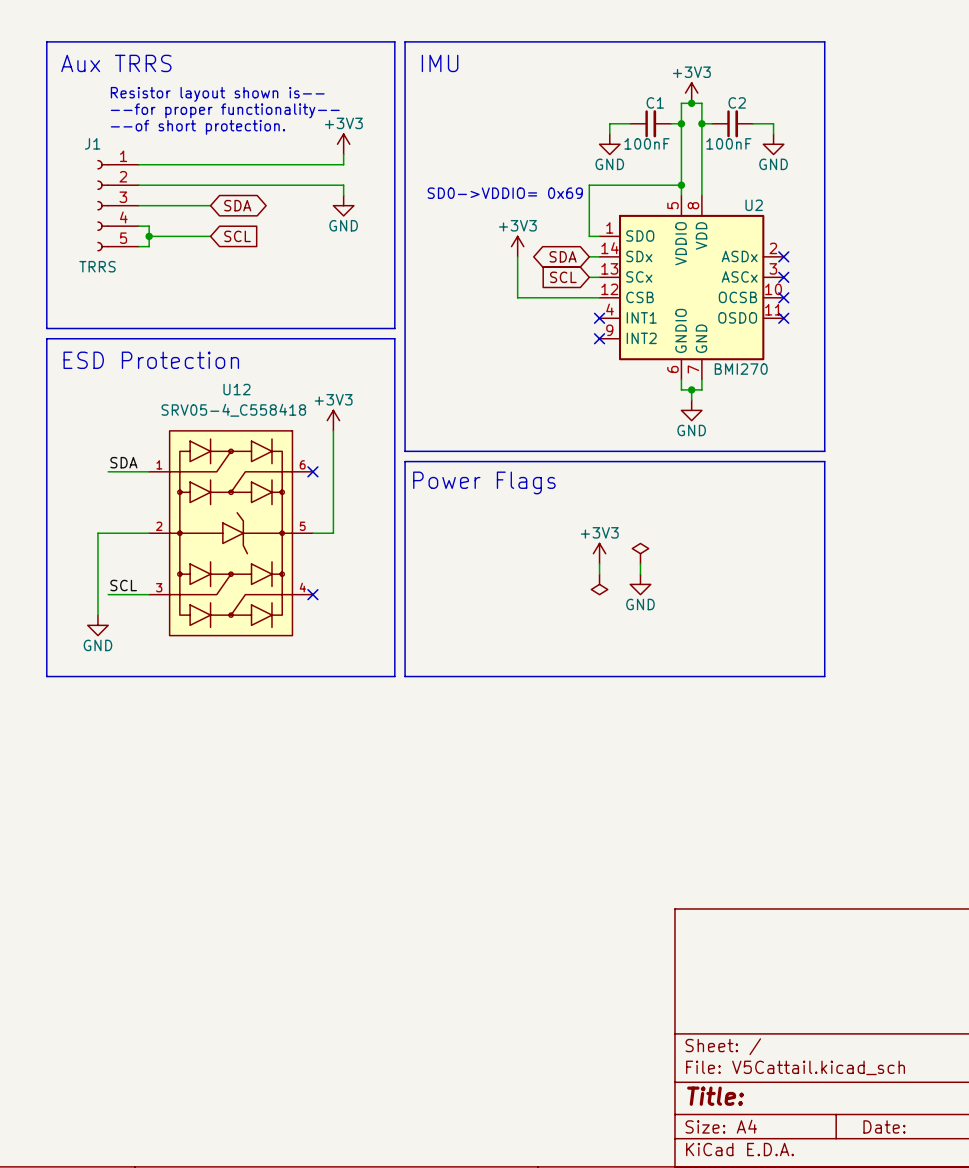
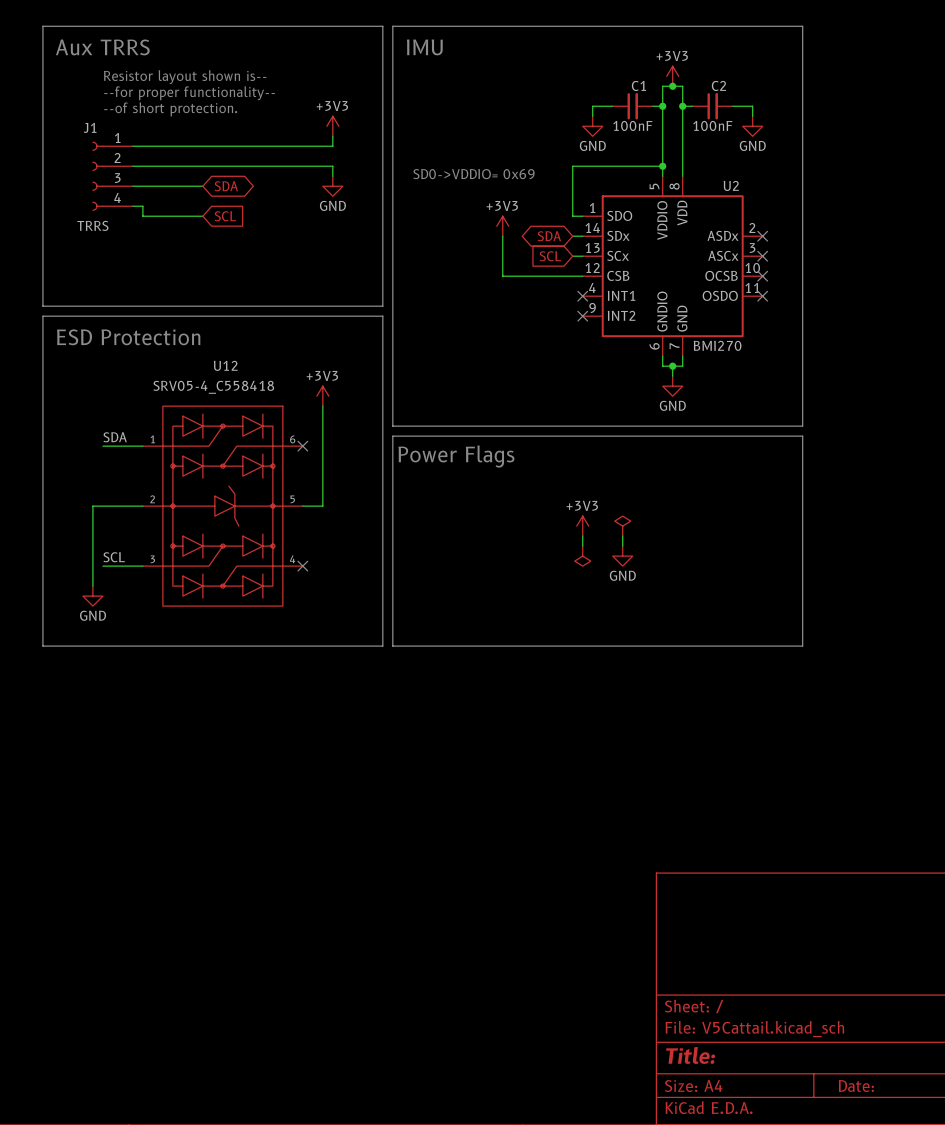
J1 symbol: [97, 160, 139, 252] -> [92, 141, 133, 211]
wire: (149, 236) (149, 246) (138, 246) -> none
junction: (149, 236) -> none

